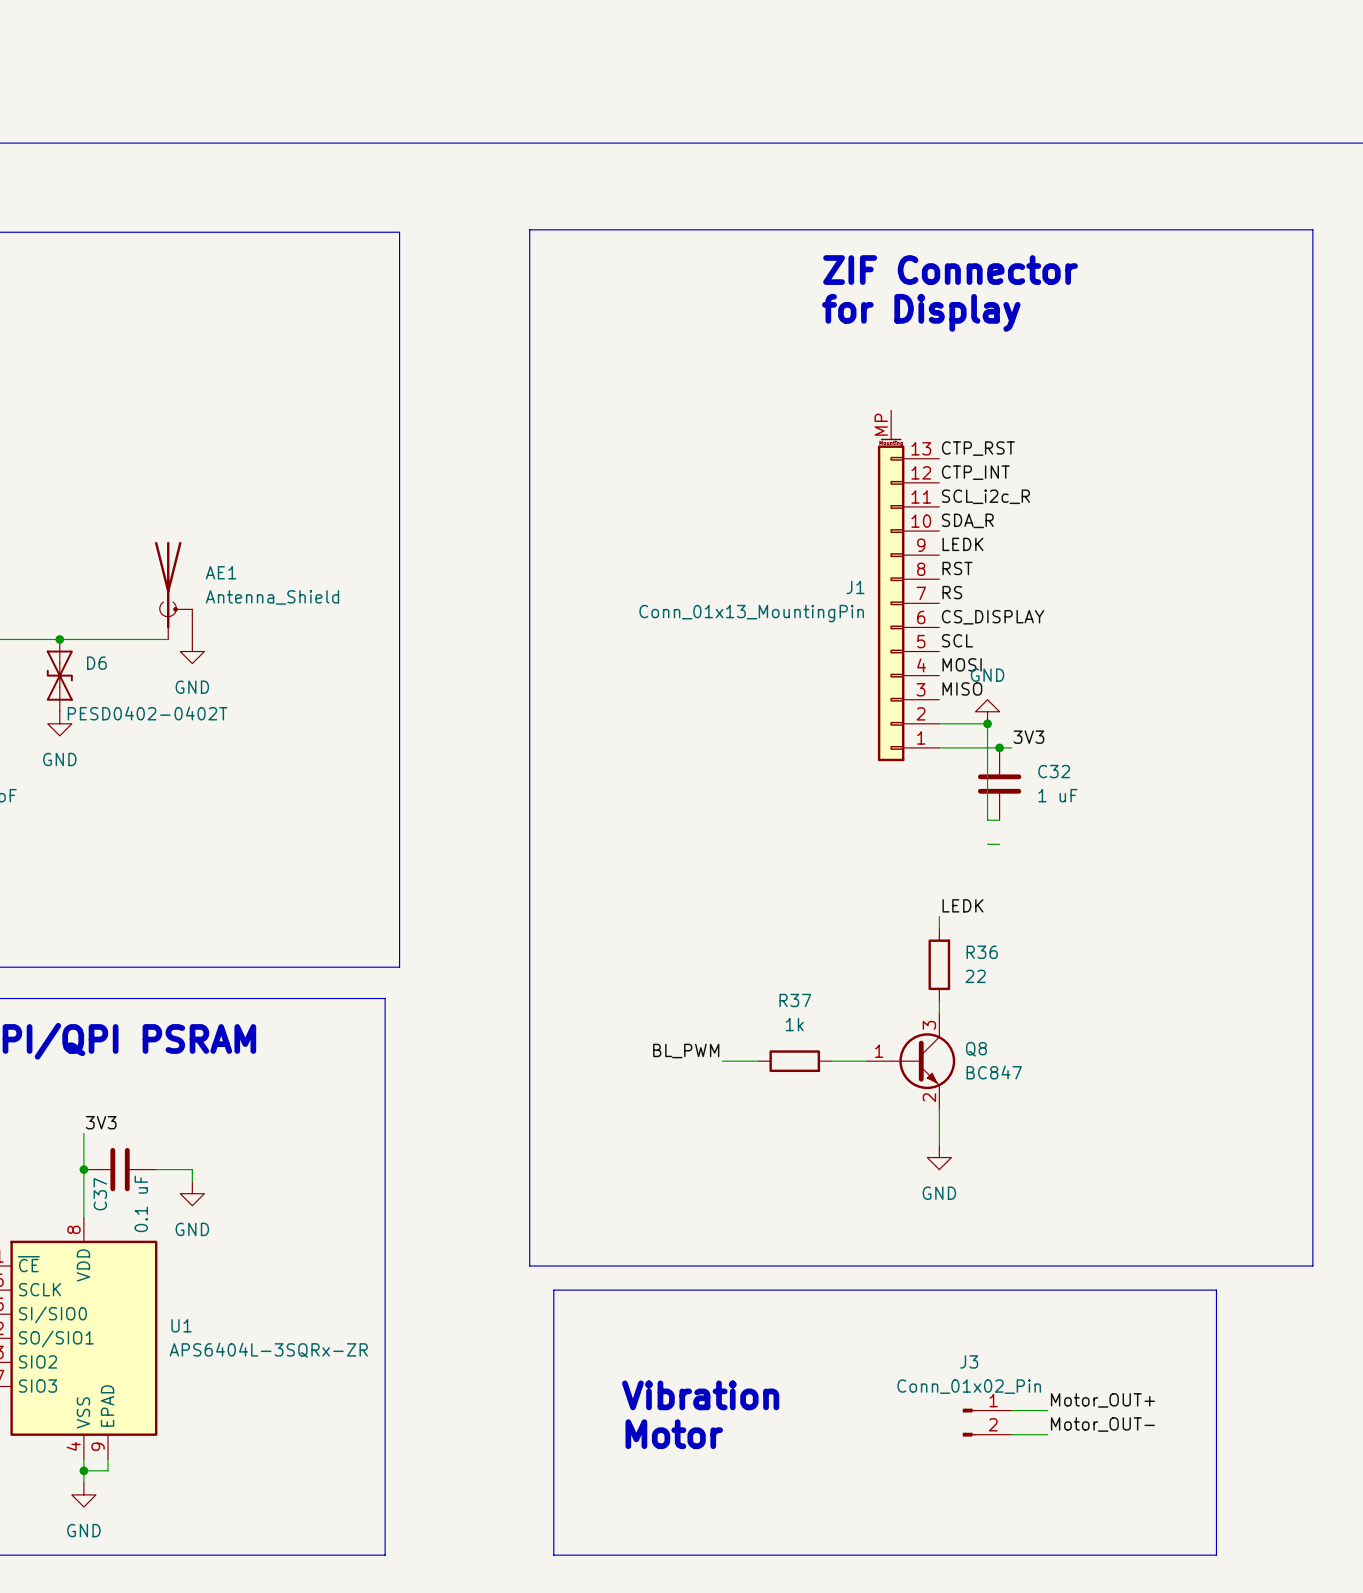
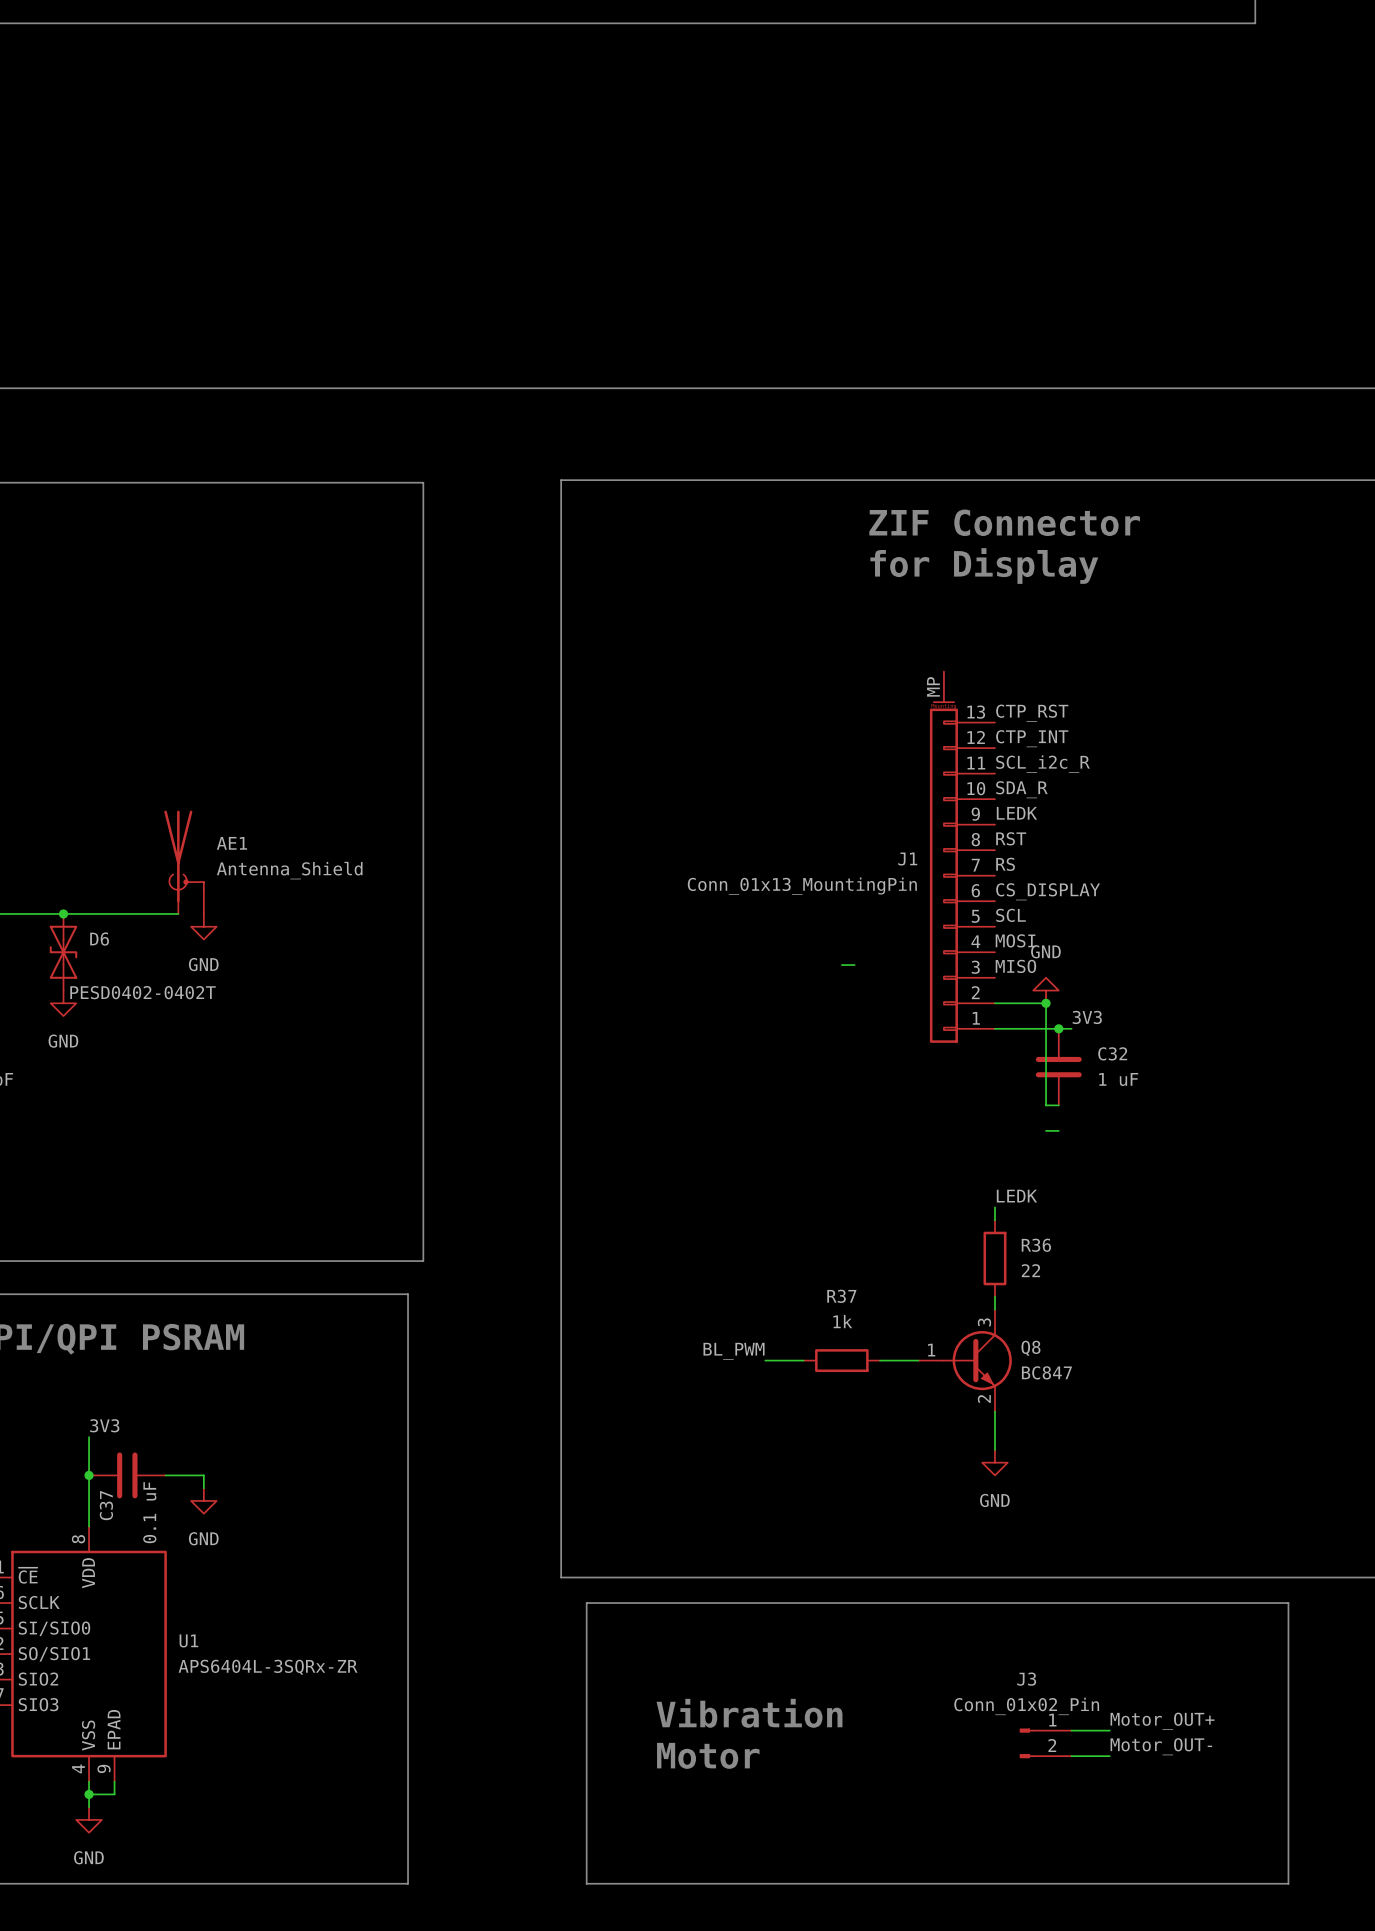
wire: none -> (841, 965) (854, 965)

